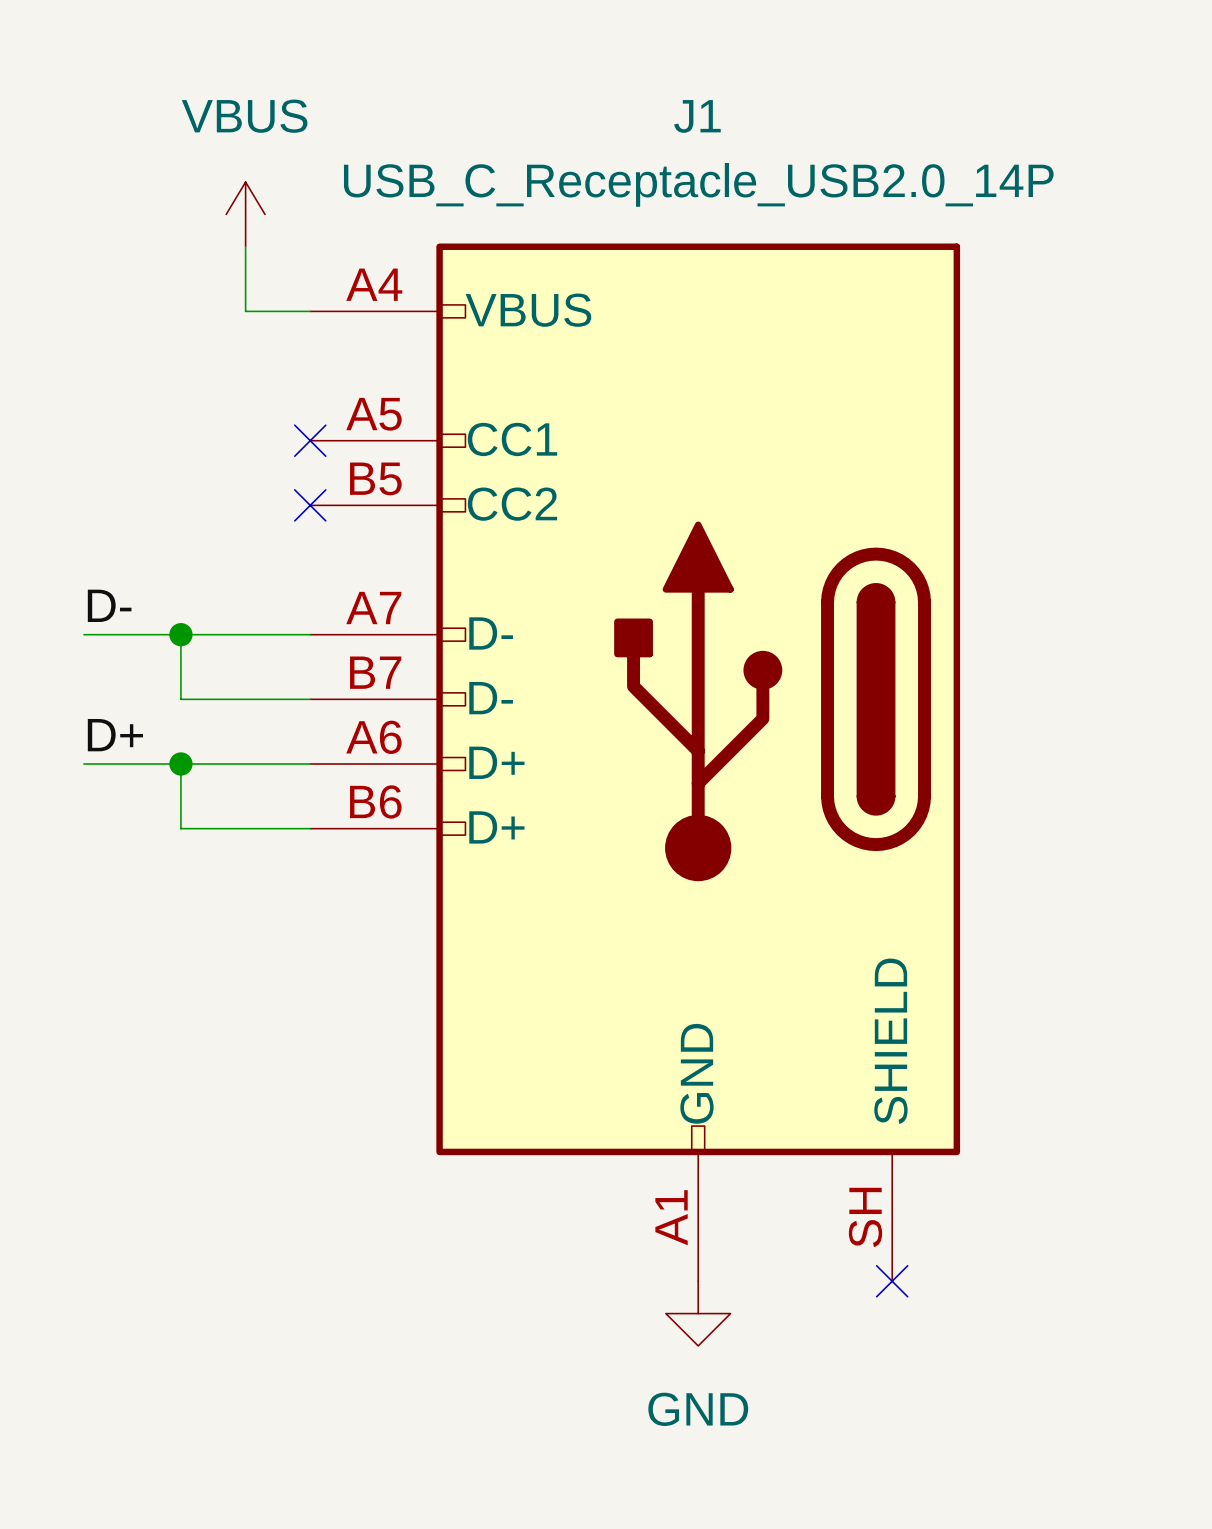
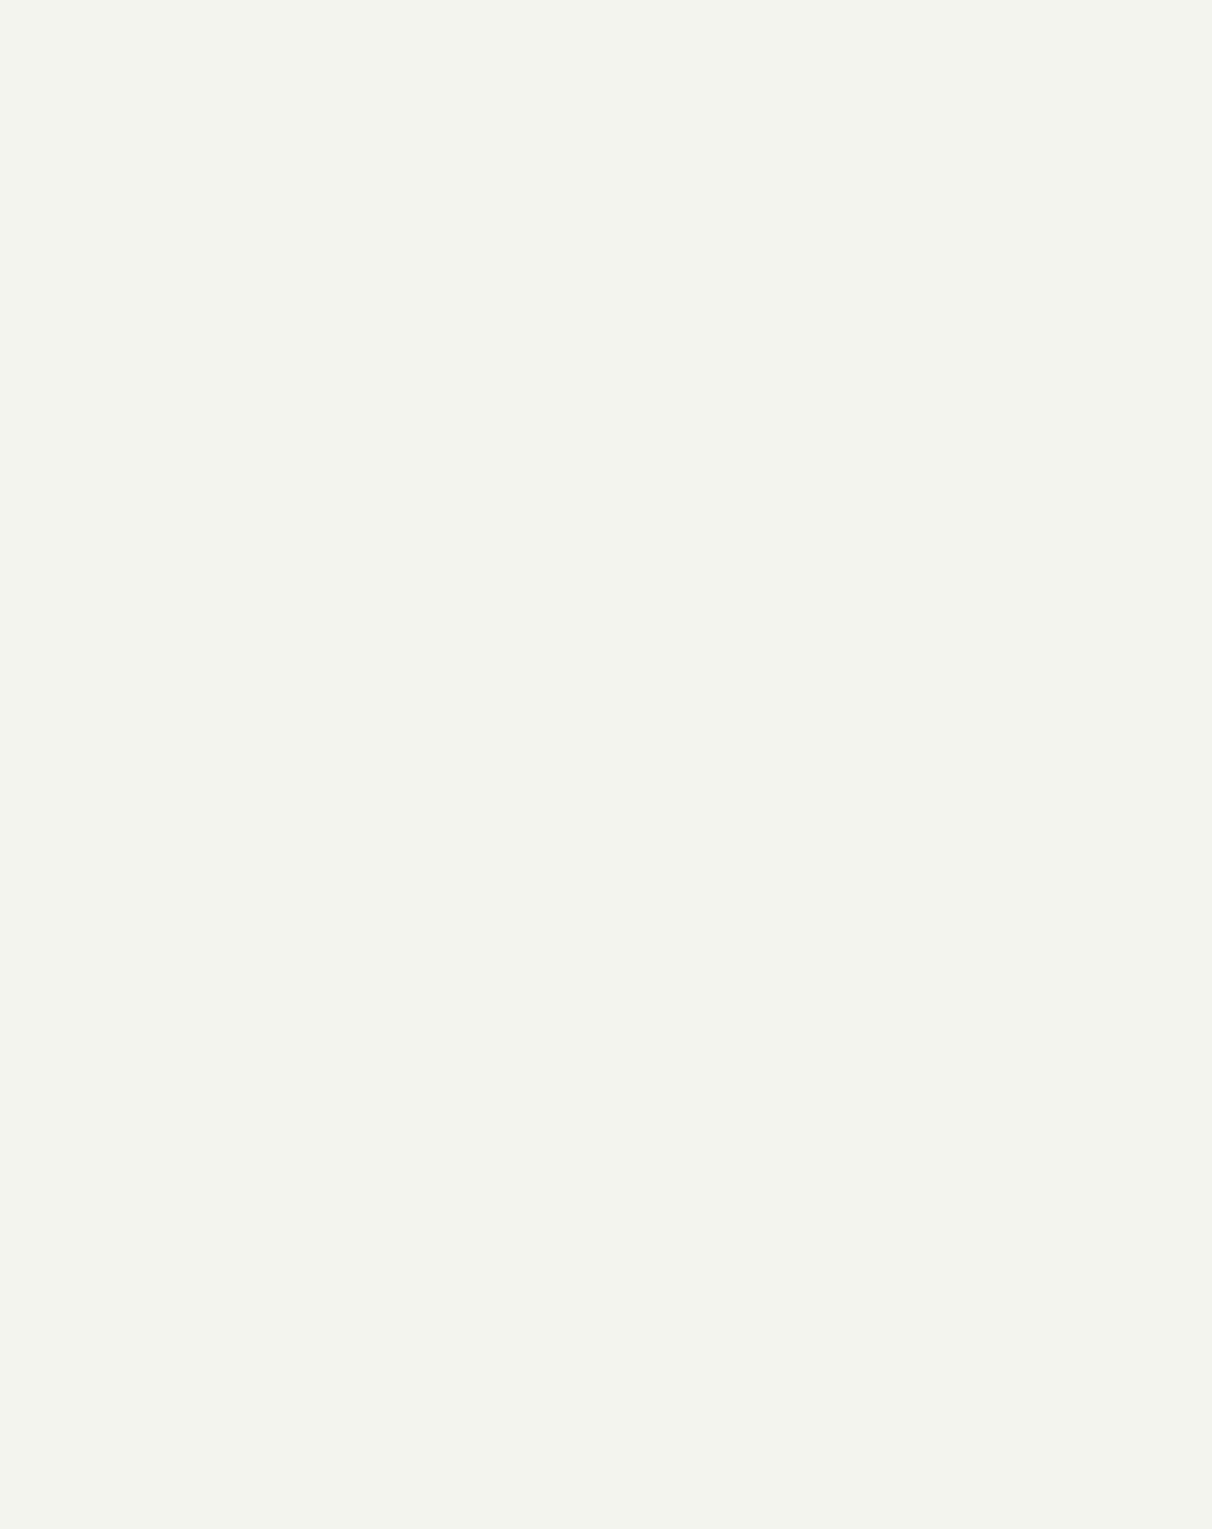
power symbol: VBUS (245, 214) -> none
wire: (245, 246) (245, 311) (310, 311) -> none
no-connect mark: (310, 440) -> none
no-connect mark: (310, 505) -> none
label: D- (109, 605) -> none
wire: (83, 634) (310, 634) -> none
wire: (180, 634) (180, 699) (310, 699) -> none
junction: (180, 634) -> none
label: D+ (115, 735) -> none
J1: USB_C_Receptacle_USB2.0_14P (635, 762) -> none
wire: (83, 764) (310, 764) -> none
wire: (180, 764) (180, 828) (310, 828) -> none
junction: (180, 764) -> none
no-connect mark: (892, 1281) -> none
power symbol: GND (698, 1313) -> none

